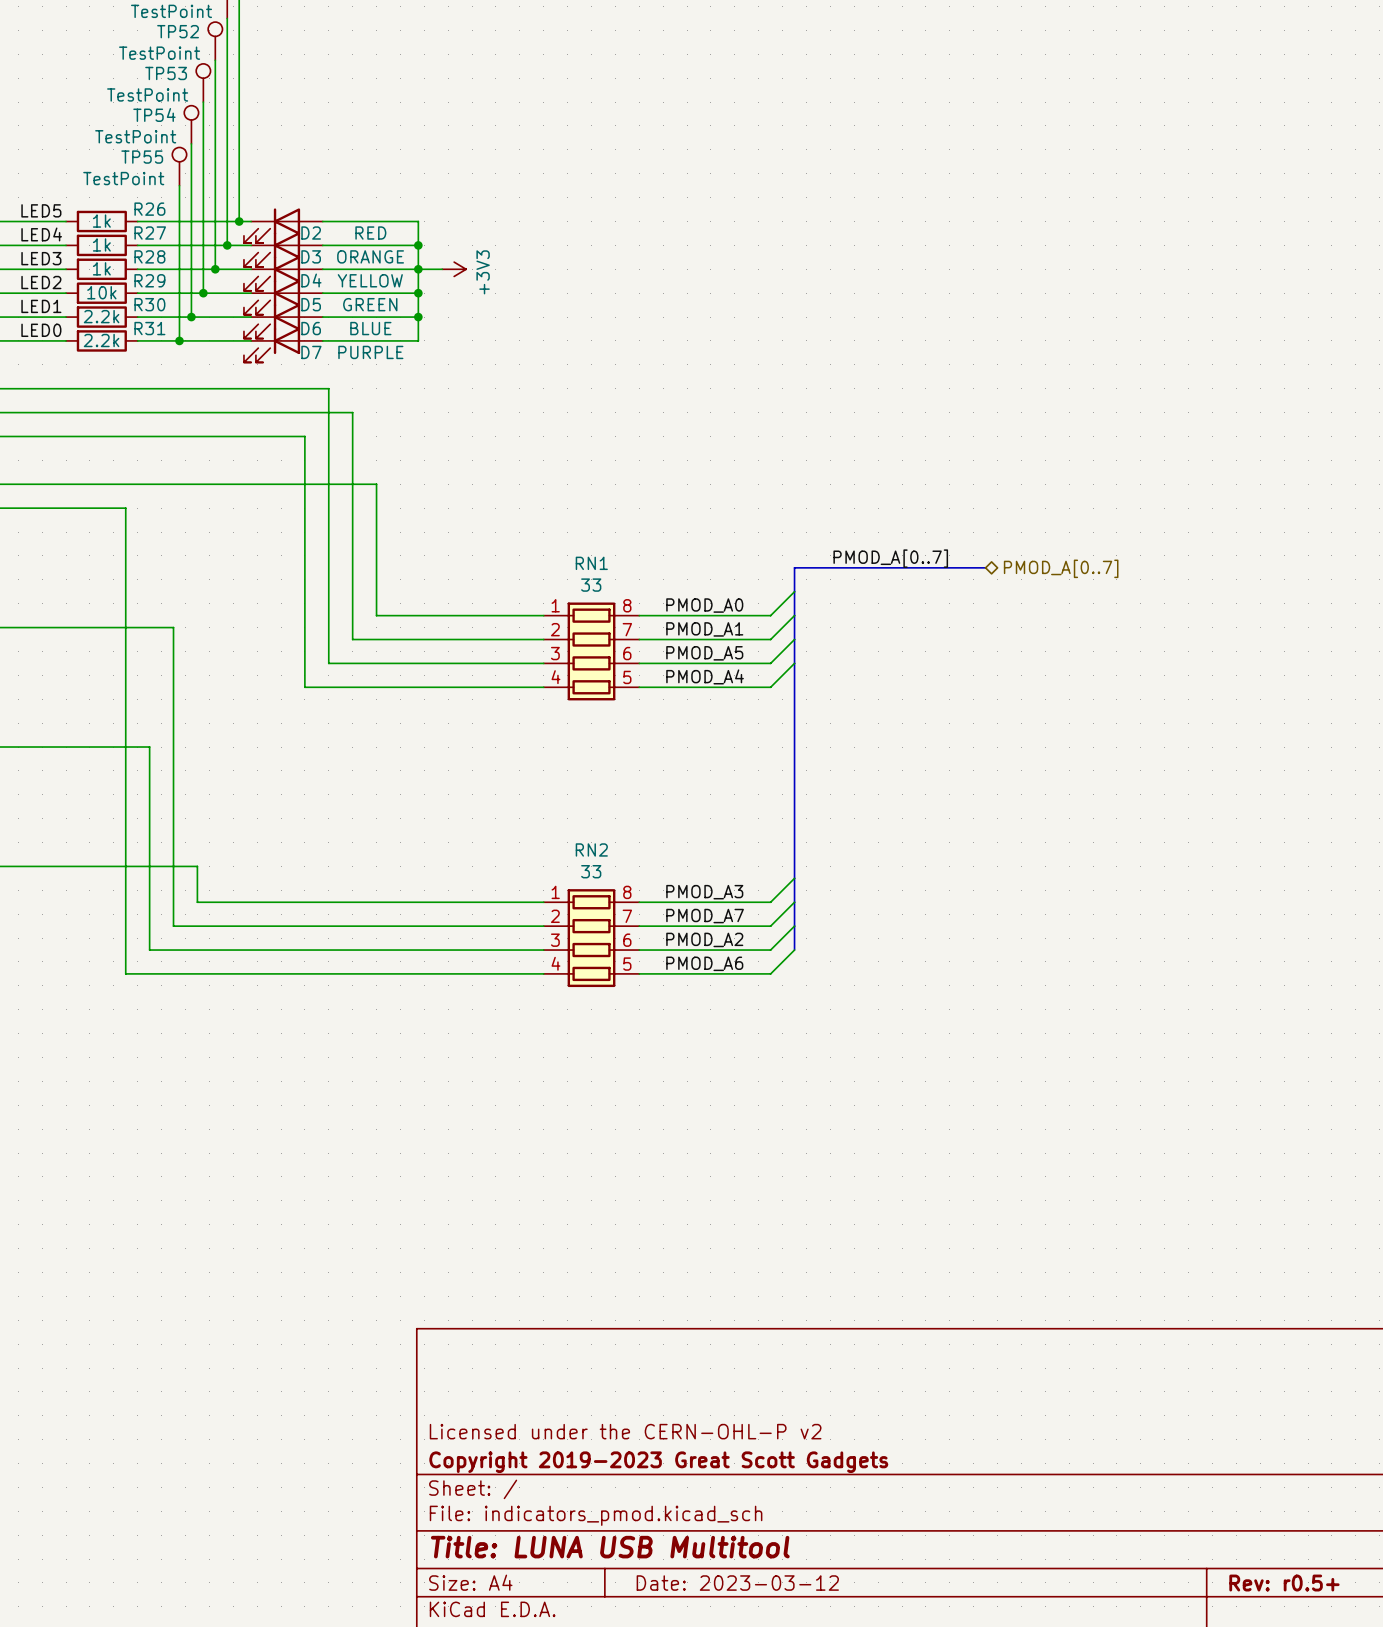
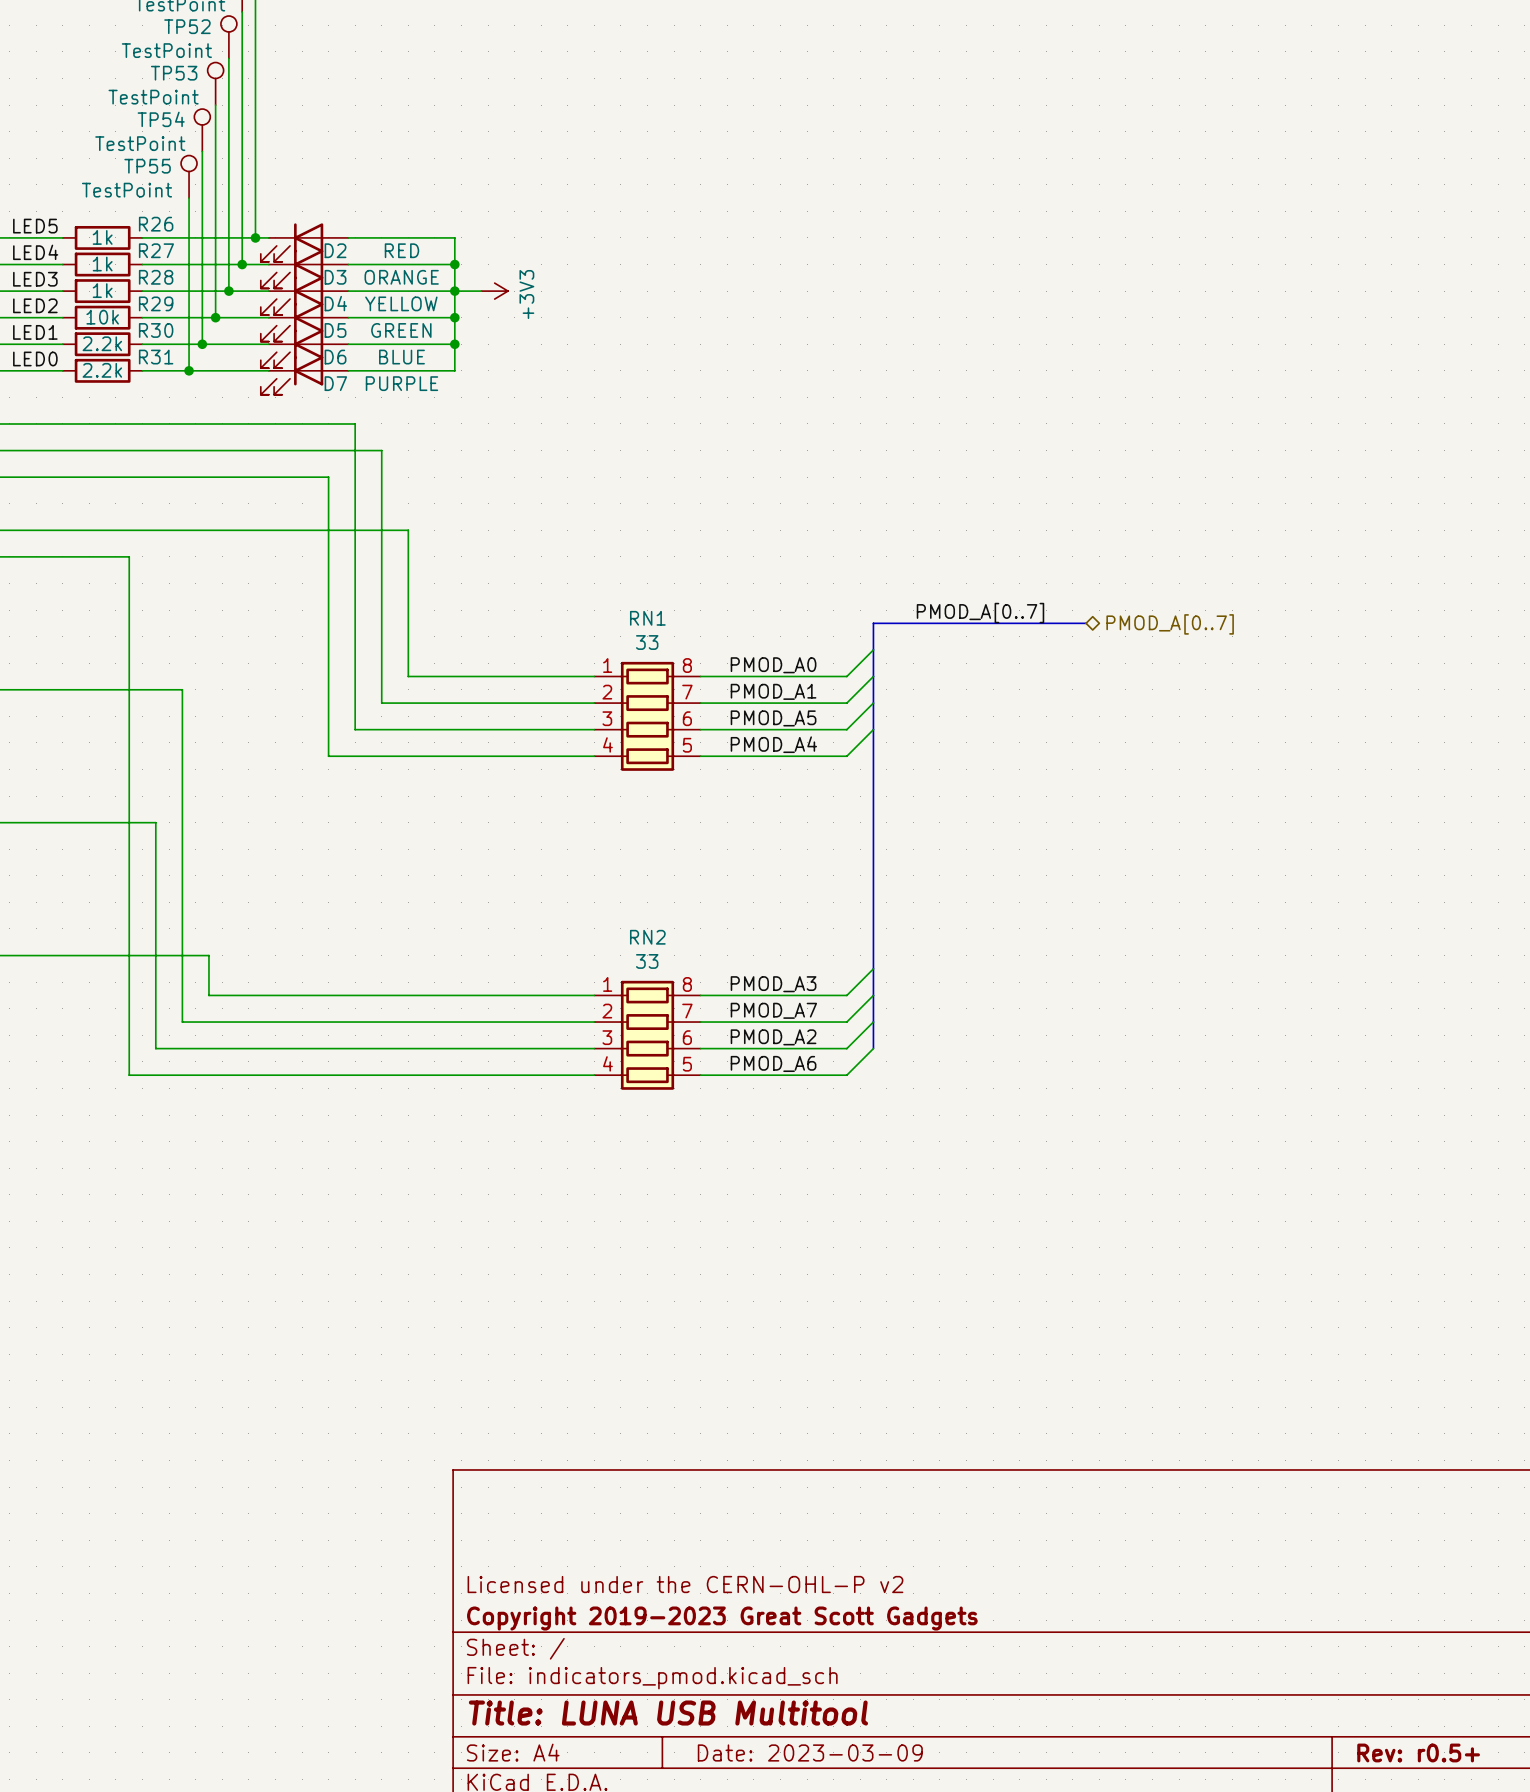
title block: Date: 2023-03-12 (737, 1583) -> Date: 2023-03-09 (810, 1752)

